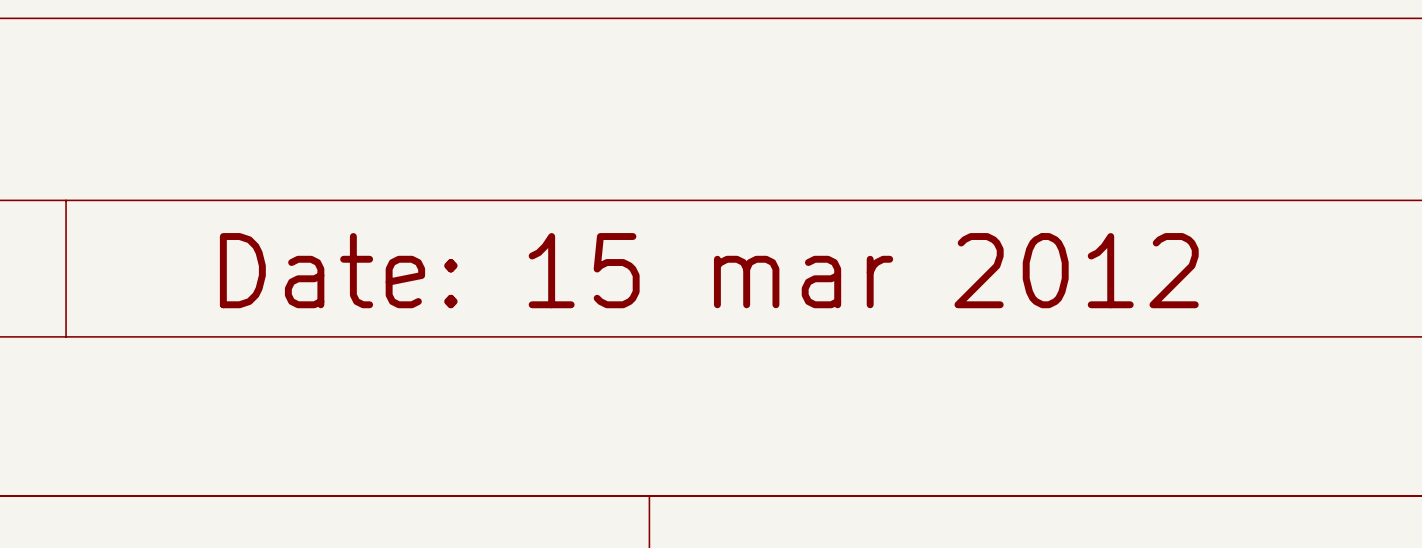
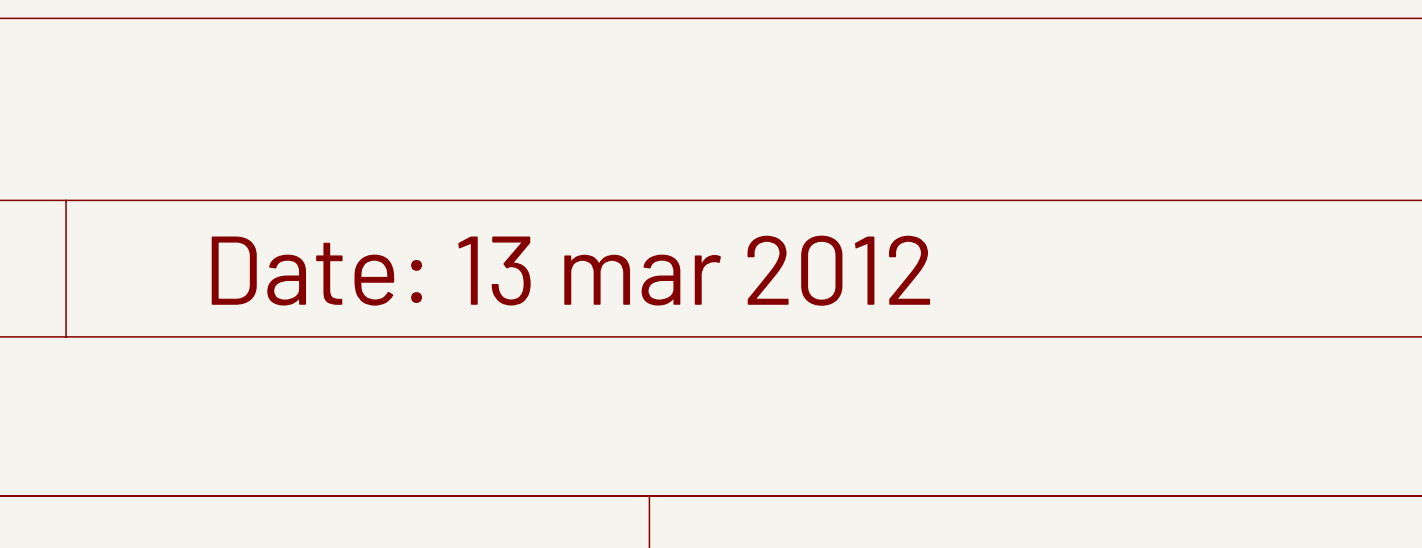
title block: Date: 15 mar 2012 (709, 270) -> Date: 13 mar 2012 (570, 270)

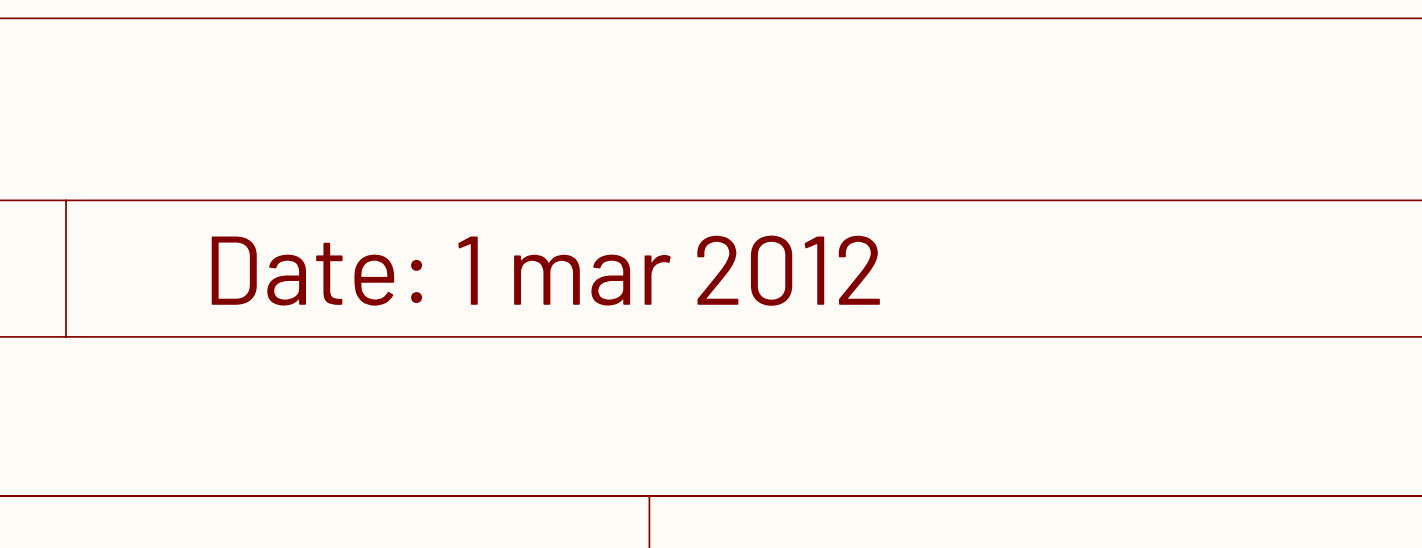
title block: Date: 13 mar 2012 (570, 270) -> Date: 1 mar 2012 (545, 270)

